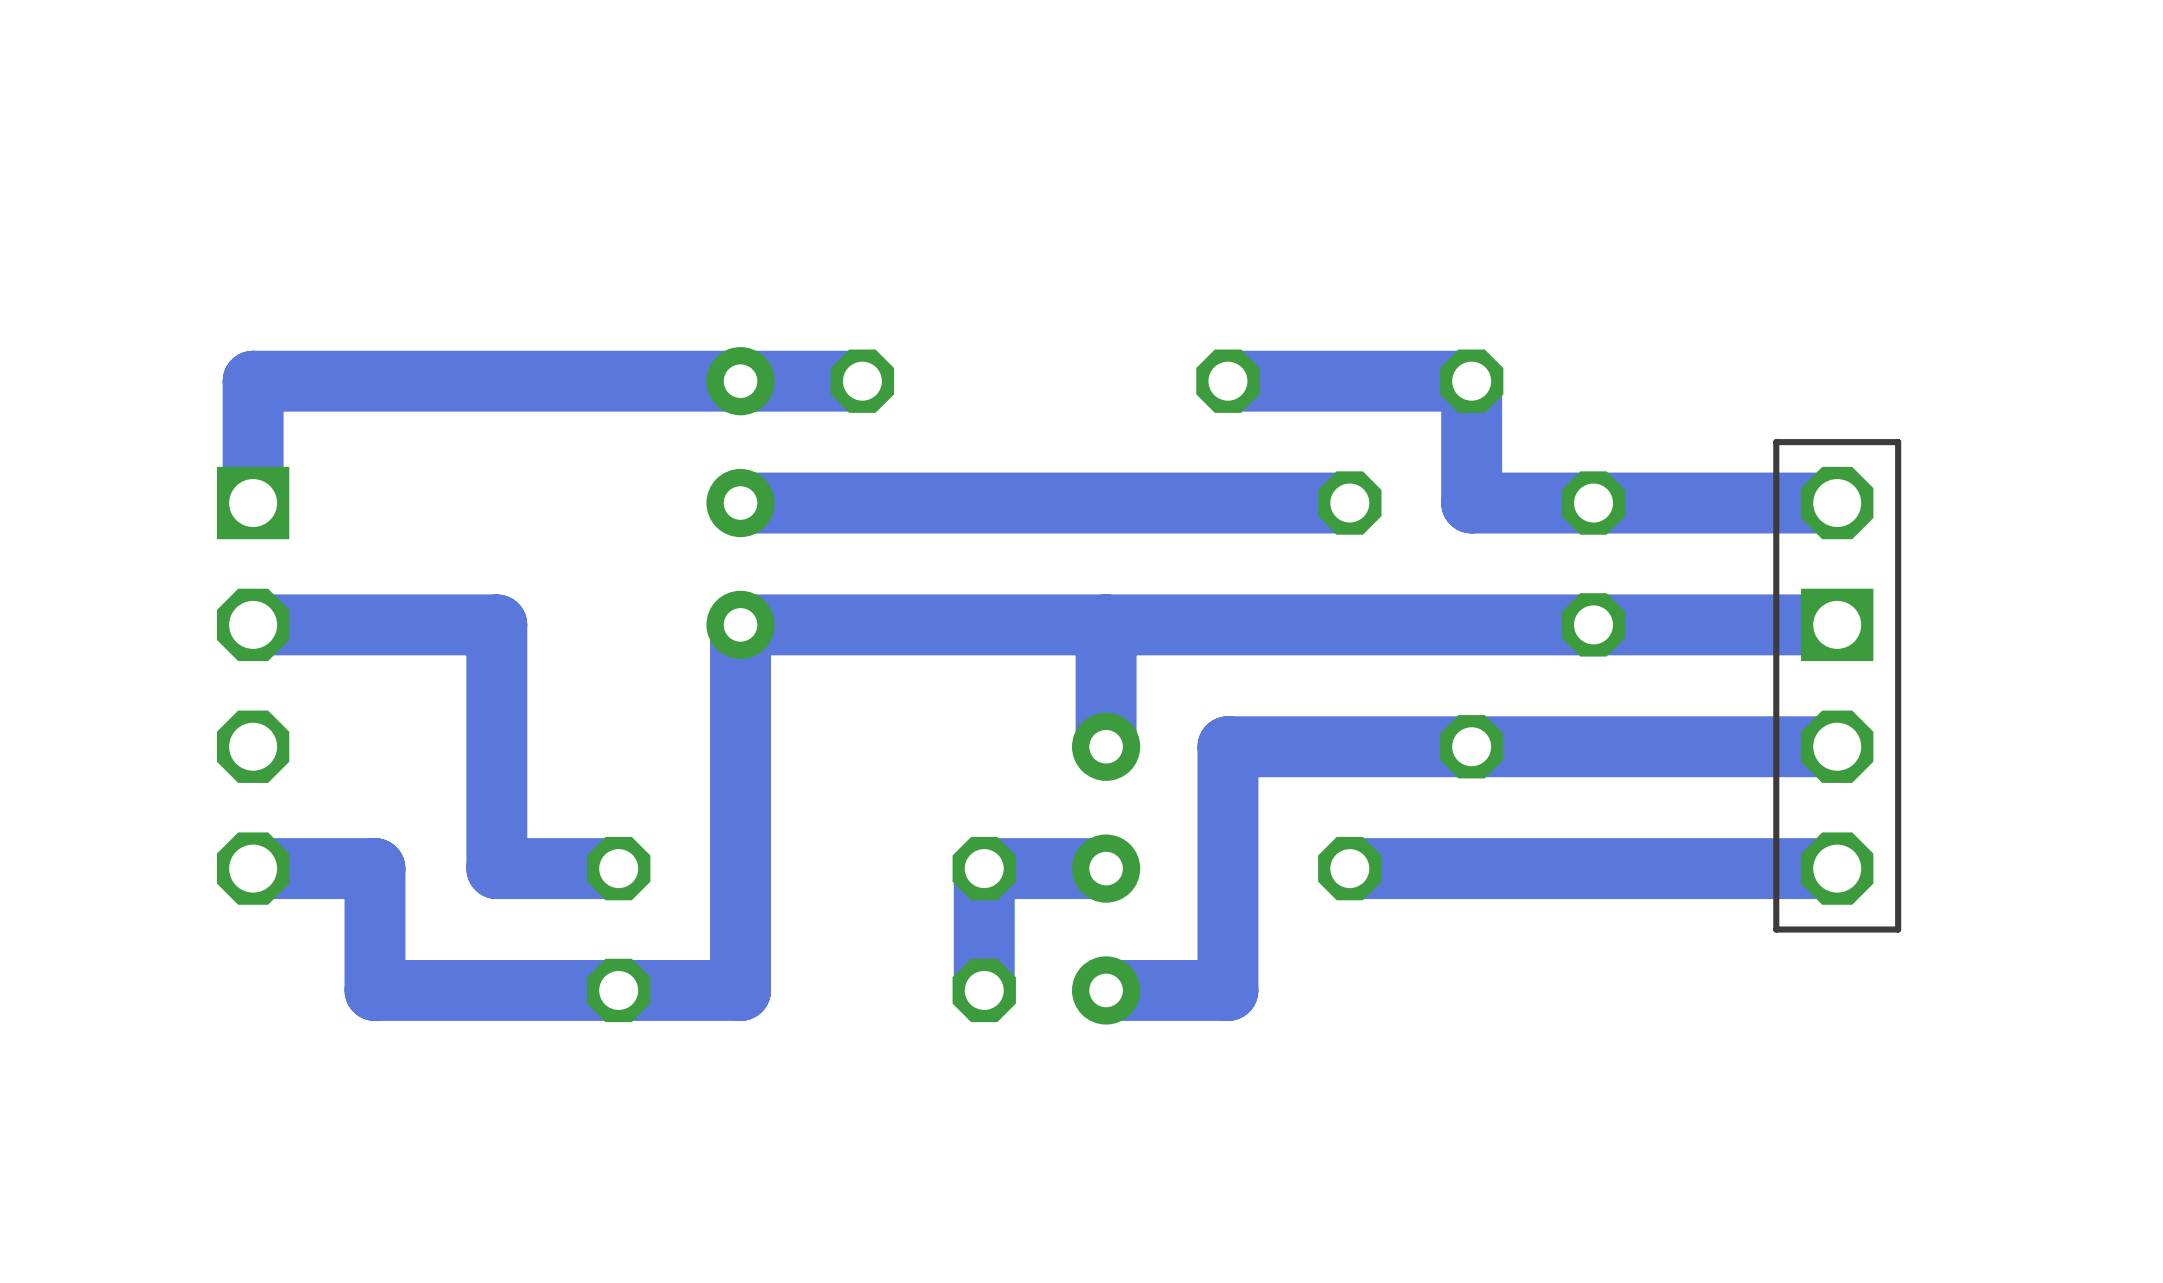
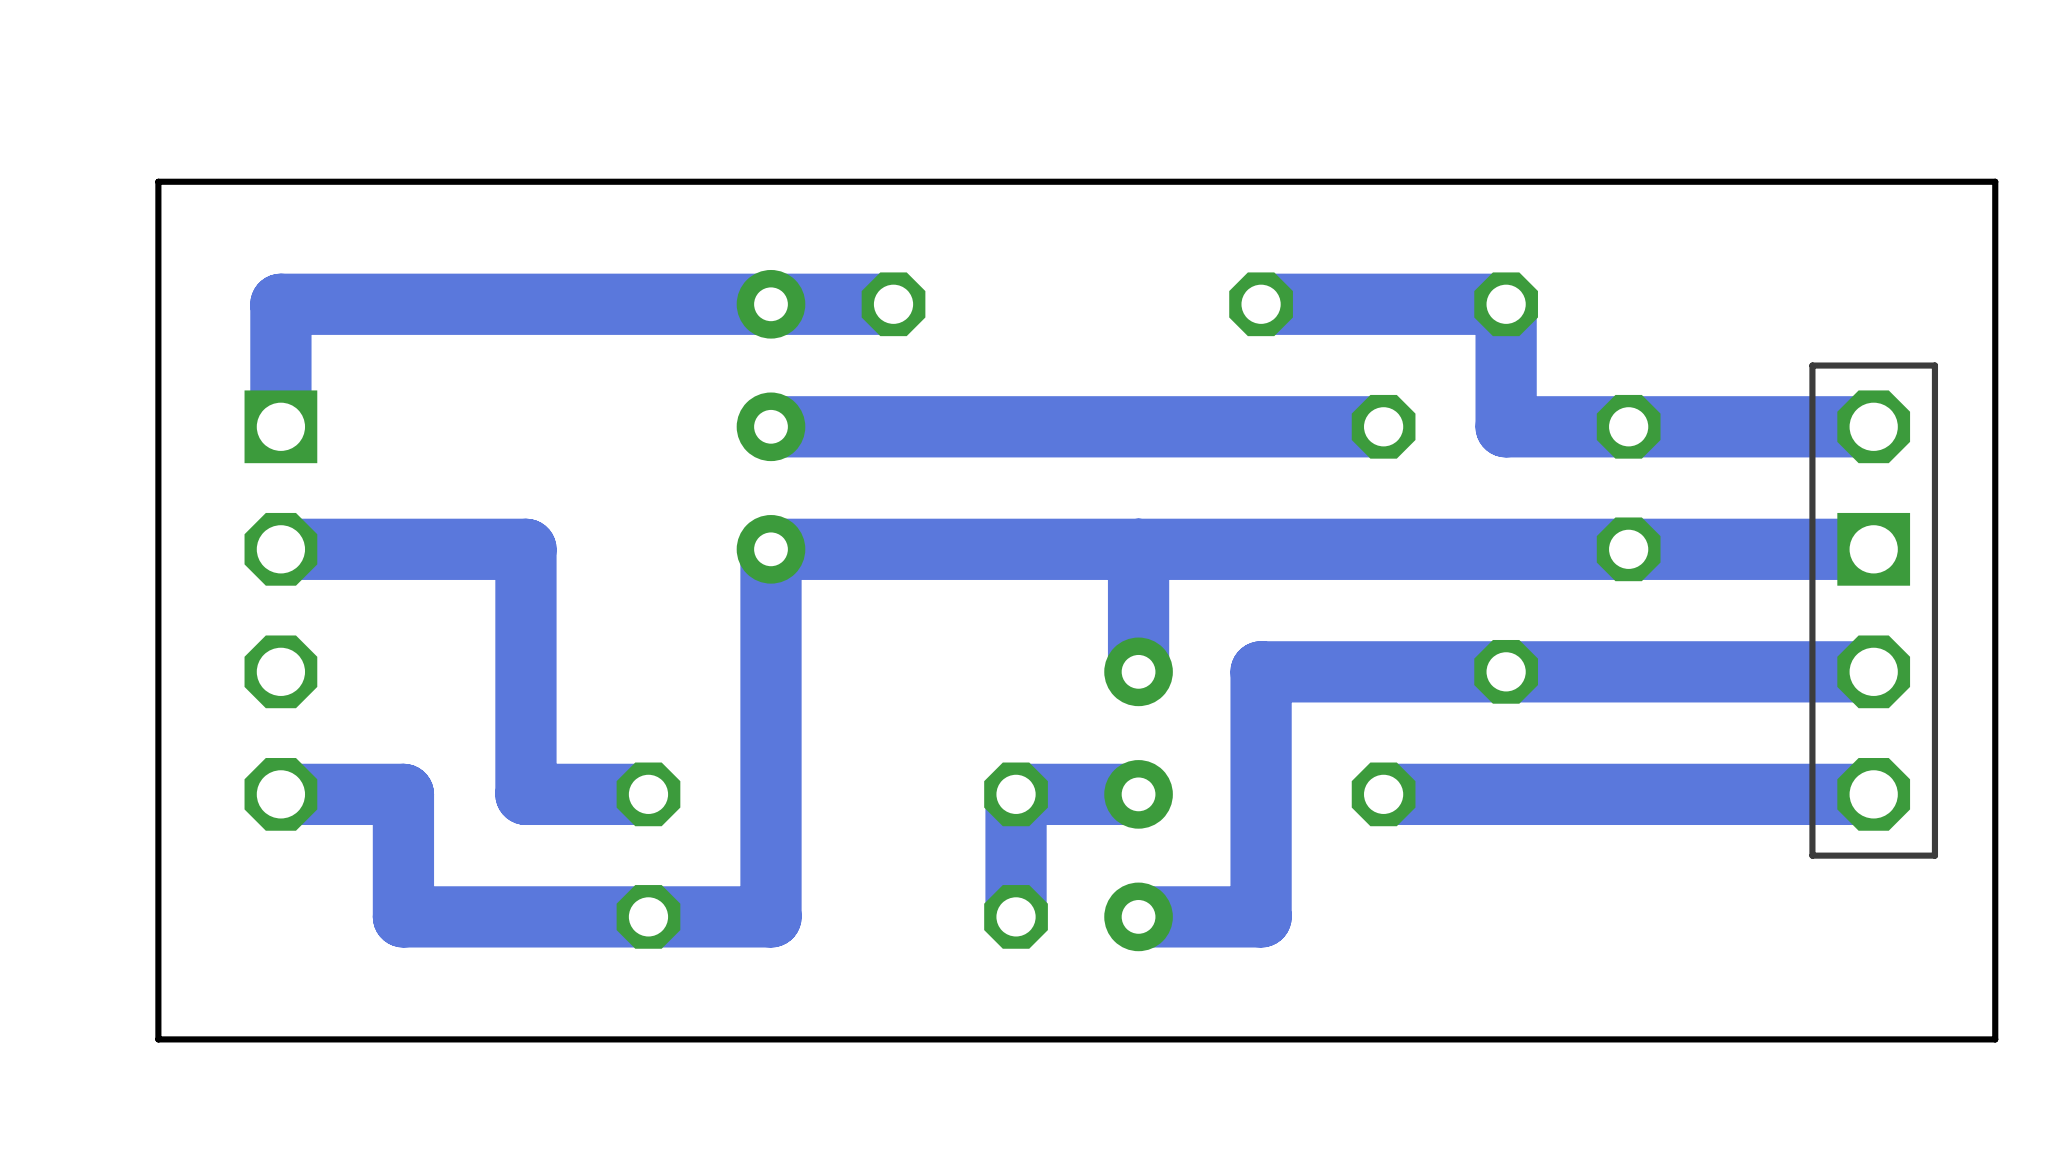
board edge: none -> (1995, 181) (158, 181) (158, 1039) (1995, 1039) (1995, 181)

